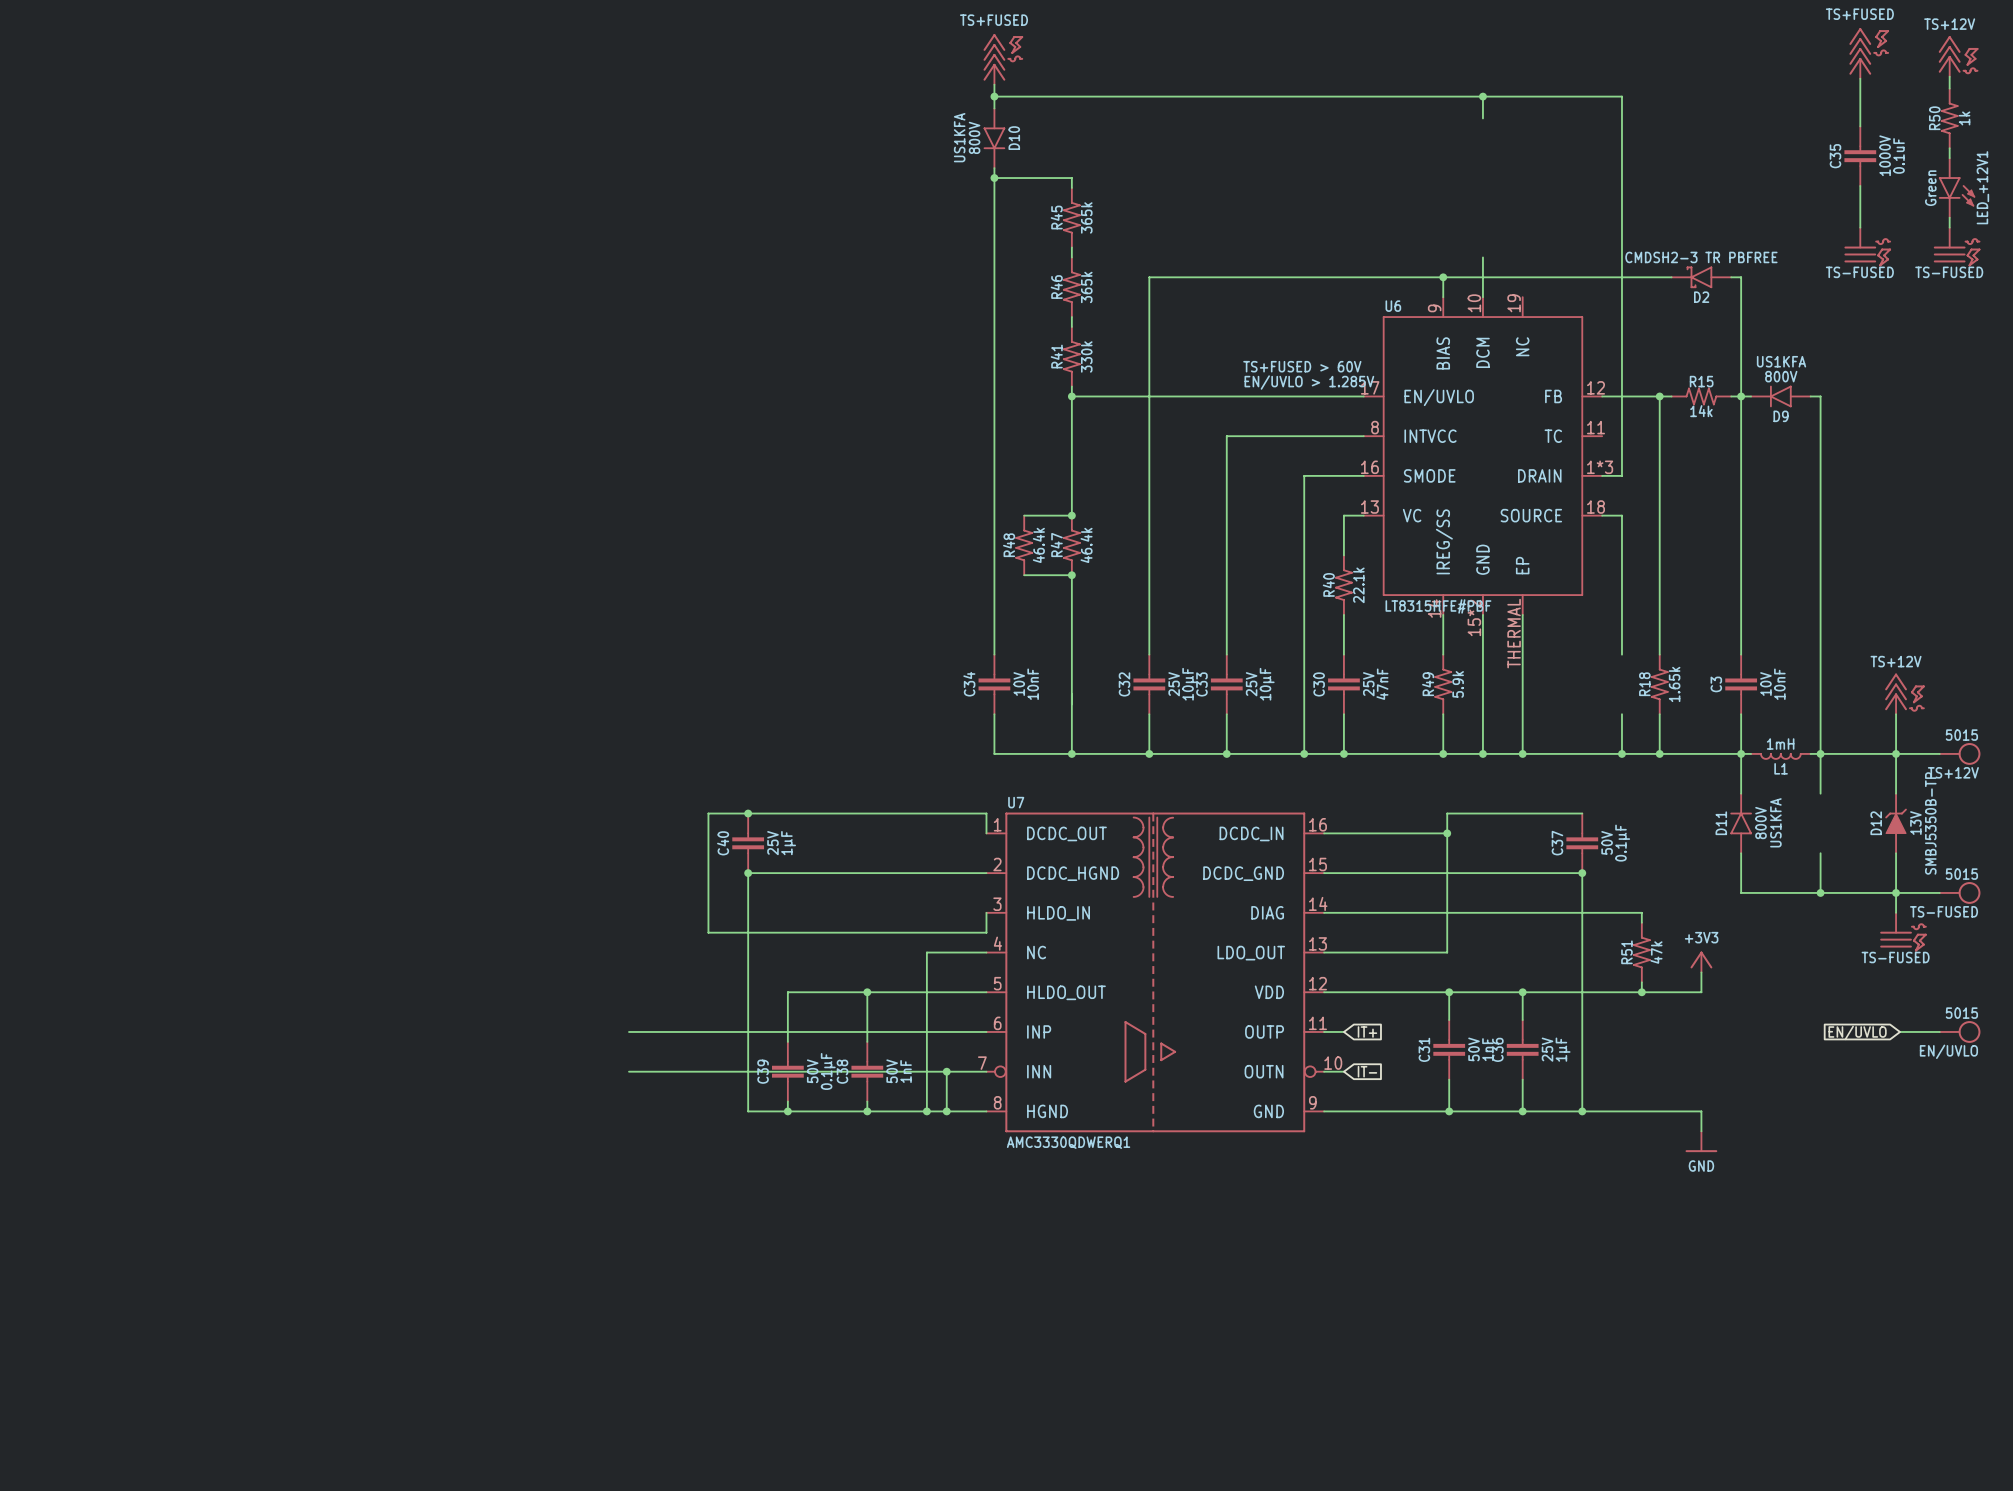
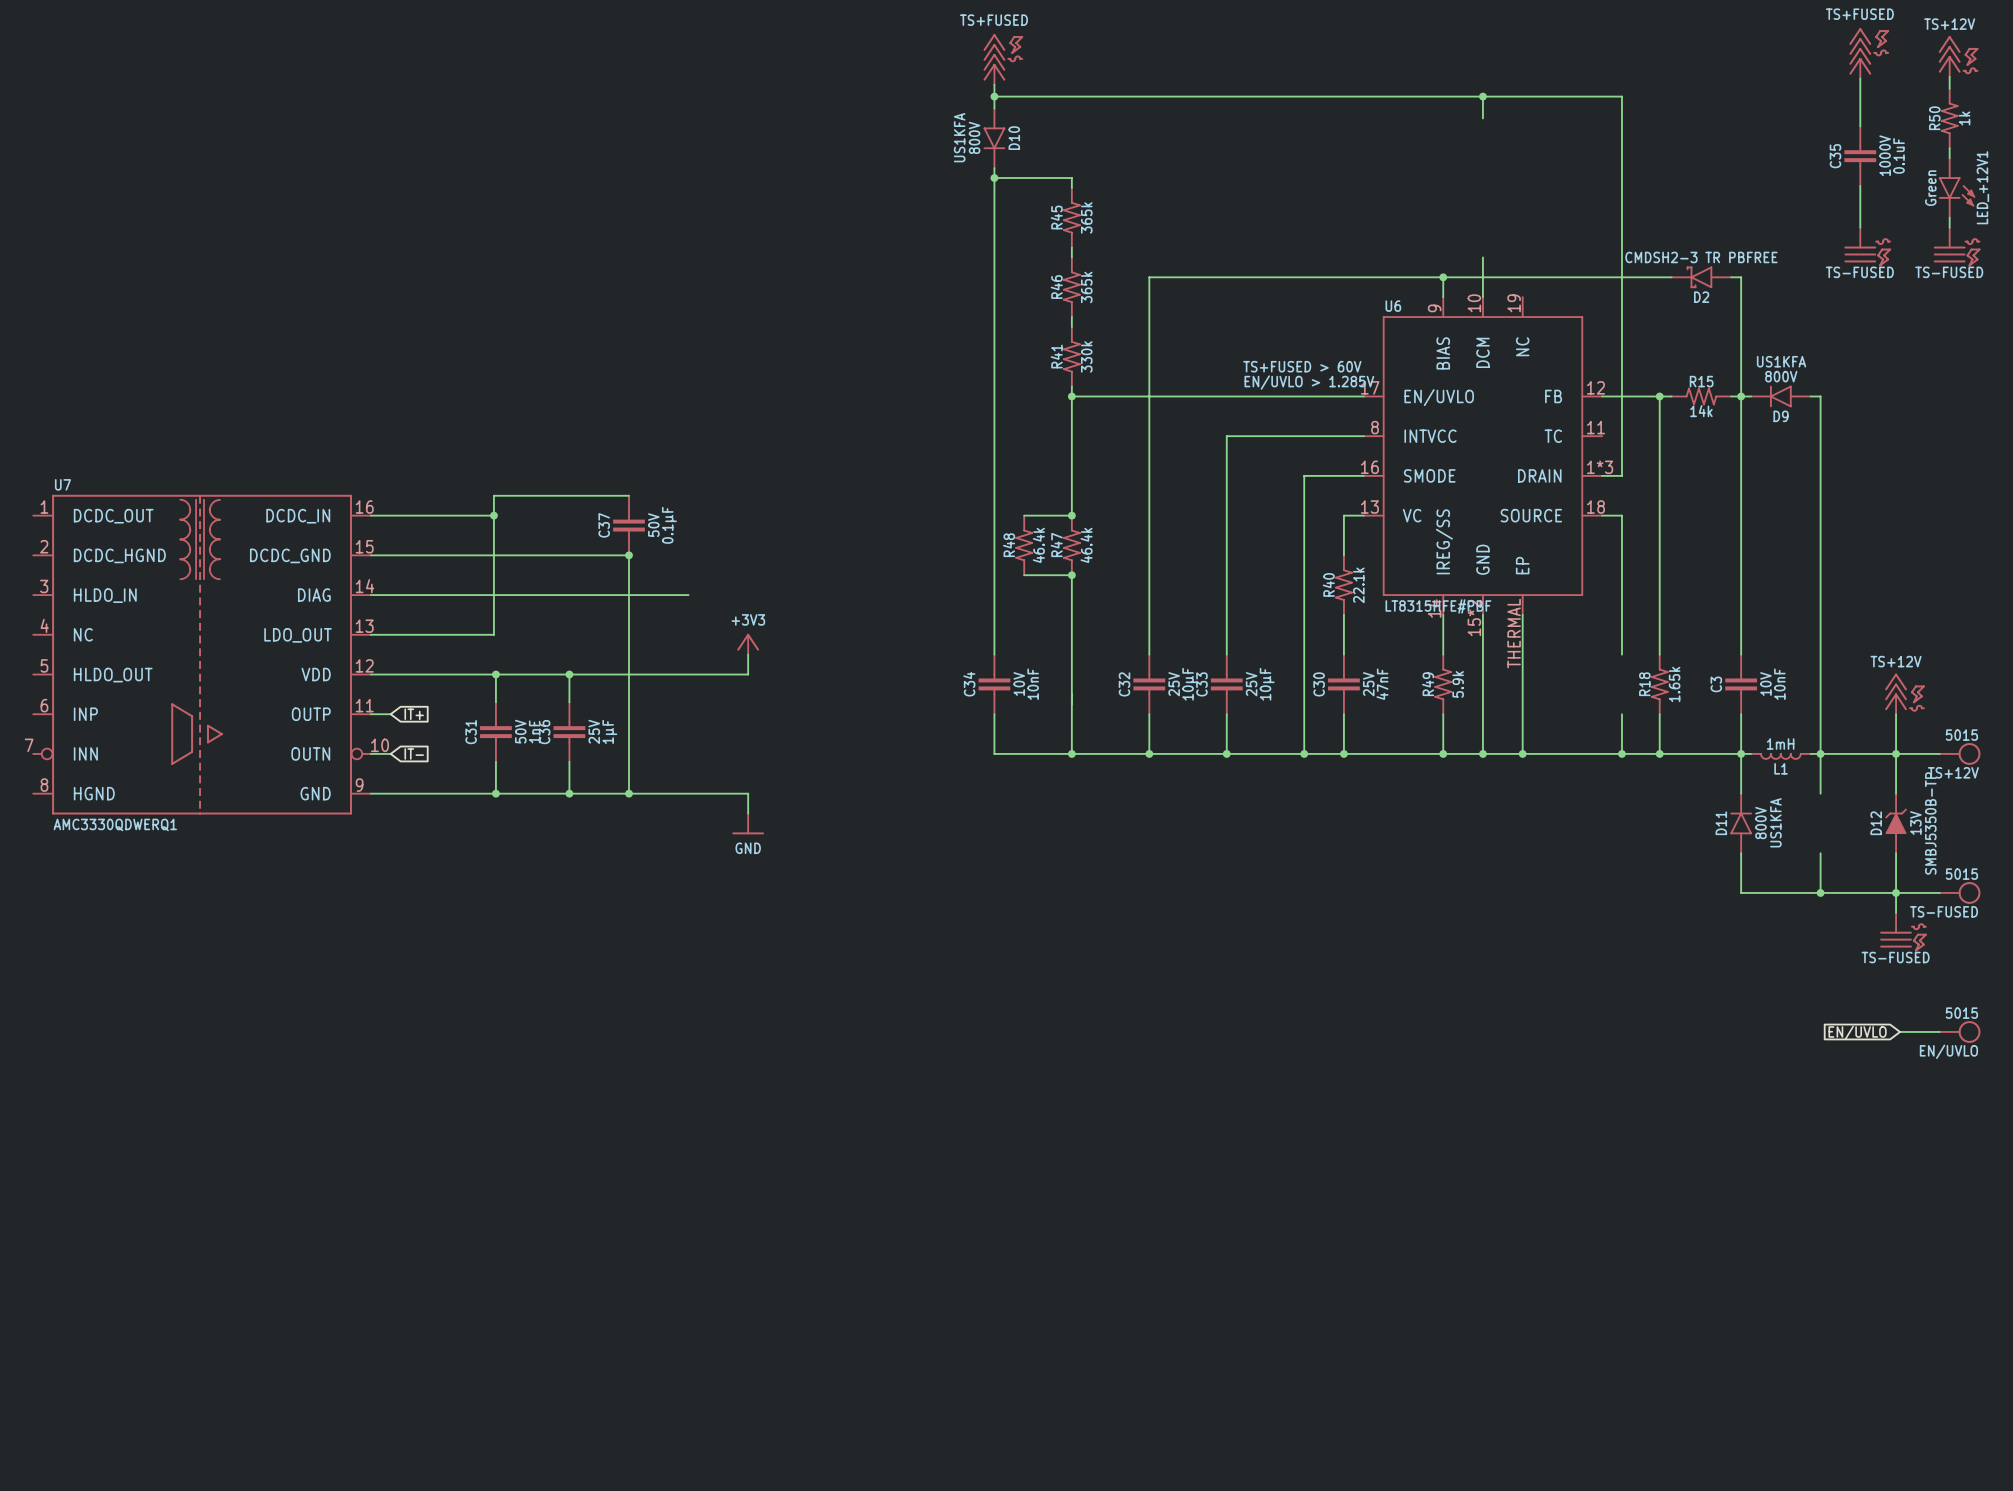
wire: none -> (629, 495) (493, 495) (493, 634) (370, 634)
wire: none -> (370, 515) (493, 515)
junction: none -> (493, 515)
wire: none -> (370, 555) (629, 555) (629, 793)
junction: none -> (629, 555)
wire: none -> (370, 595) (688, 595)
power symbol: none -> +3V3 (748, 644)
wire: none -> (748, 654) (748, 674) (370, 674)
wire: none -> (495, 674) (495, 702)
junction: none -> (495, 674)
wire: none -> (569, 674) (569, 702)
junction: none -> (569, 674)
wire: none -> (370, 714) (390, 714)
global label: none -> IT+ (414, 714)
wire: none -> (370, 753) (390, 753)
global label: none -> IT- (414, 753)
wire: none -> (495, 761) (495, 793)
wire: none -> (569, 761) (569, 793)
wire: none -> (370, 793) (748, 793) (748, 813)
junction: none -> (495, 793)
junction: none -> (569, 793)
junction: none -> (629, 793)
junction: (748, 813) -> none
wire: (1582, 813) (1447, 813) (1447, 952) (1324, 952) -> none
power symbol: none -> GND (748, 823)
wire: (986, 833) (986, 813) (708, 813) (708, 932) (986, 932) (986, 912) -> none
wire: (1324, 833) (1447, 833) -> none
junction: (1447, 833) -> none
C40: (748, 843) -> none
C37 position: (1582, 843) -> (629, 525)
junction: (748, 873) -> none
wire: (986, 873) (748, 873) (748, 1111) (986, 1111) -> none
wire: (1324, 873) (1582, 873) (1582, 1111) -> none
junction: (1582, 873) -> none
wire: (1324, 912) (1641, 912) (1641, 922) -> none
wire: (986, 952) (926, 952) (926, 1111) -> none
R51: (1641, 952) -> none
power symbol: +3V3 (1701, 961) -> none
U7 position: (1155, 972) -> (202, 654)
wire: (1701, 972) (1701, 992) (1324, 992) -> none
wire: (1641, 982) (1641, 992) -> none
wire: (867, 992) (867, 1041) -> none
junction: (867, 992) -> none
wire: (986, 992) (787, 992) (787, 1041) -> none
wire: (1449, 992) (1449, 1020) -> none
junction: (1449, 992) -> none
wire: (1522, 992) (1522, 1020) -> none
junction: (1522, 992) -> none
junction: (1641, 992) -> none
wire: (629, 1031) (986, 1031) -> none
wire: (1324, 1031) (1343, 1031) -> none
global label: IT+ (1367, 1031) -> none
C31 position: (1449, 1049) -> (495, 732)
C36 position: (1522, 1049) -> (569, 732)
wire: (629, 1071) (986, 1071) -> none
C39: (787, 1071) -> none
C38: (867, 1071) -> none
wire: (946, 1071) (946, 1111) -> none
junction: (946, 1071) -> none
wire: (1324, 1071) (1343, 1071) -> none
global label: IT- (1367, 1071) -> none
wire: (1449, 1079) (1449, 1111) -> none
wire: (1522, 1079) (1522, 1111) -> none
wire: (787, 1101) (787, 1111) -> none
wire: (867, 1101) (867, 1111) -> none
junction: (787, 1111) -> none
junction: (867, 1111) -> none
junction: (926, 1111) -> none
junction: (946, 1111) -> none
wire: (1324, 1111) (1701, 1111) (1701, 1131) -> none
junction: (1449, 1111) -> none
junction: (1522, 1111) -> none
junction: (1582, 1111) -> none
power symbol: GND (1701, 1141) -> none

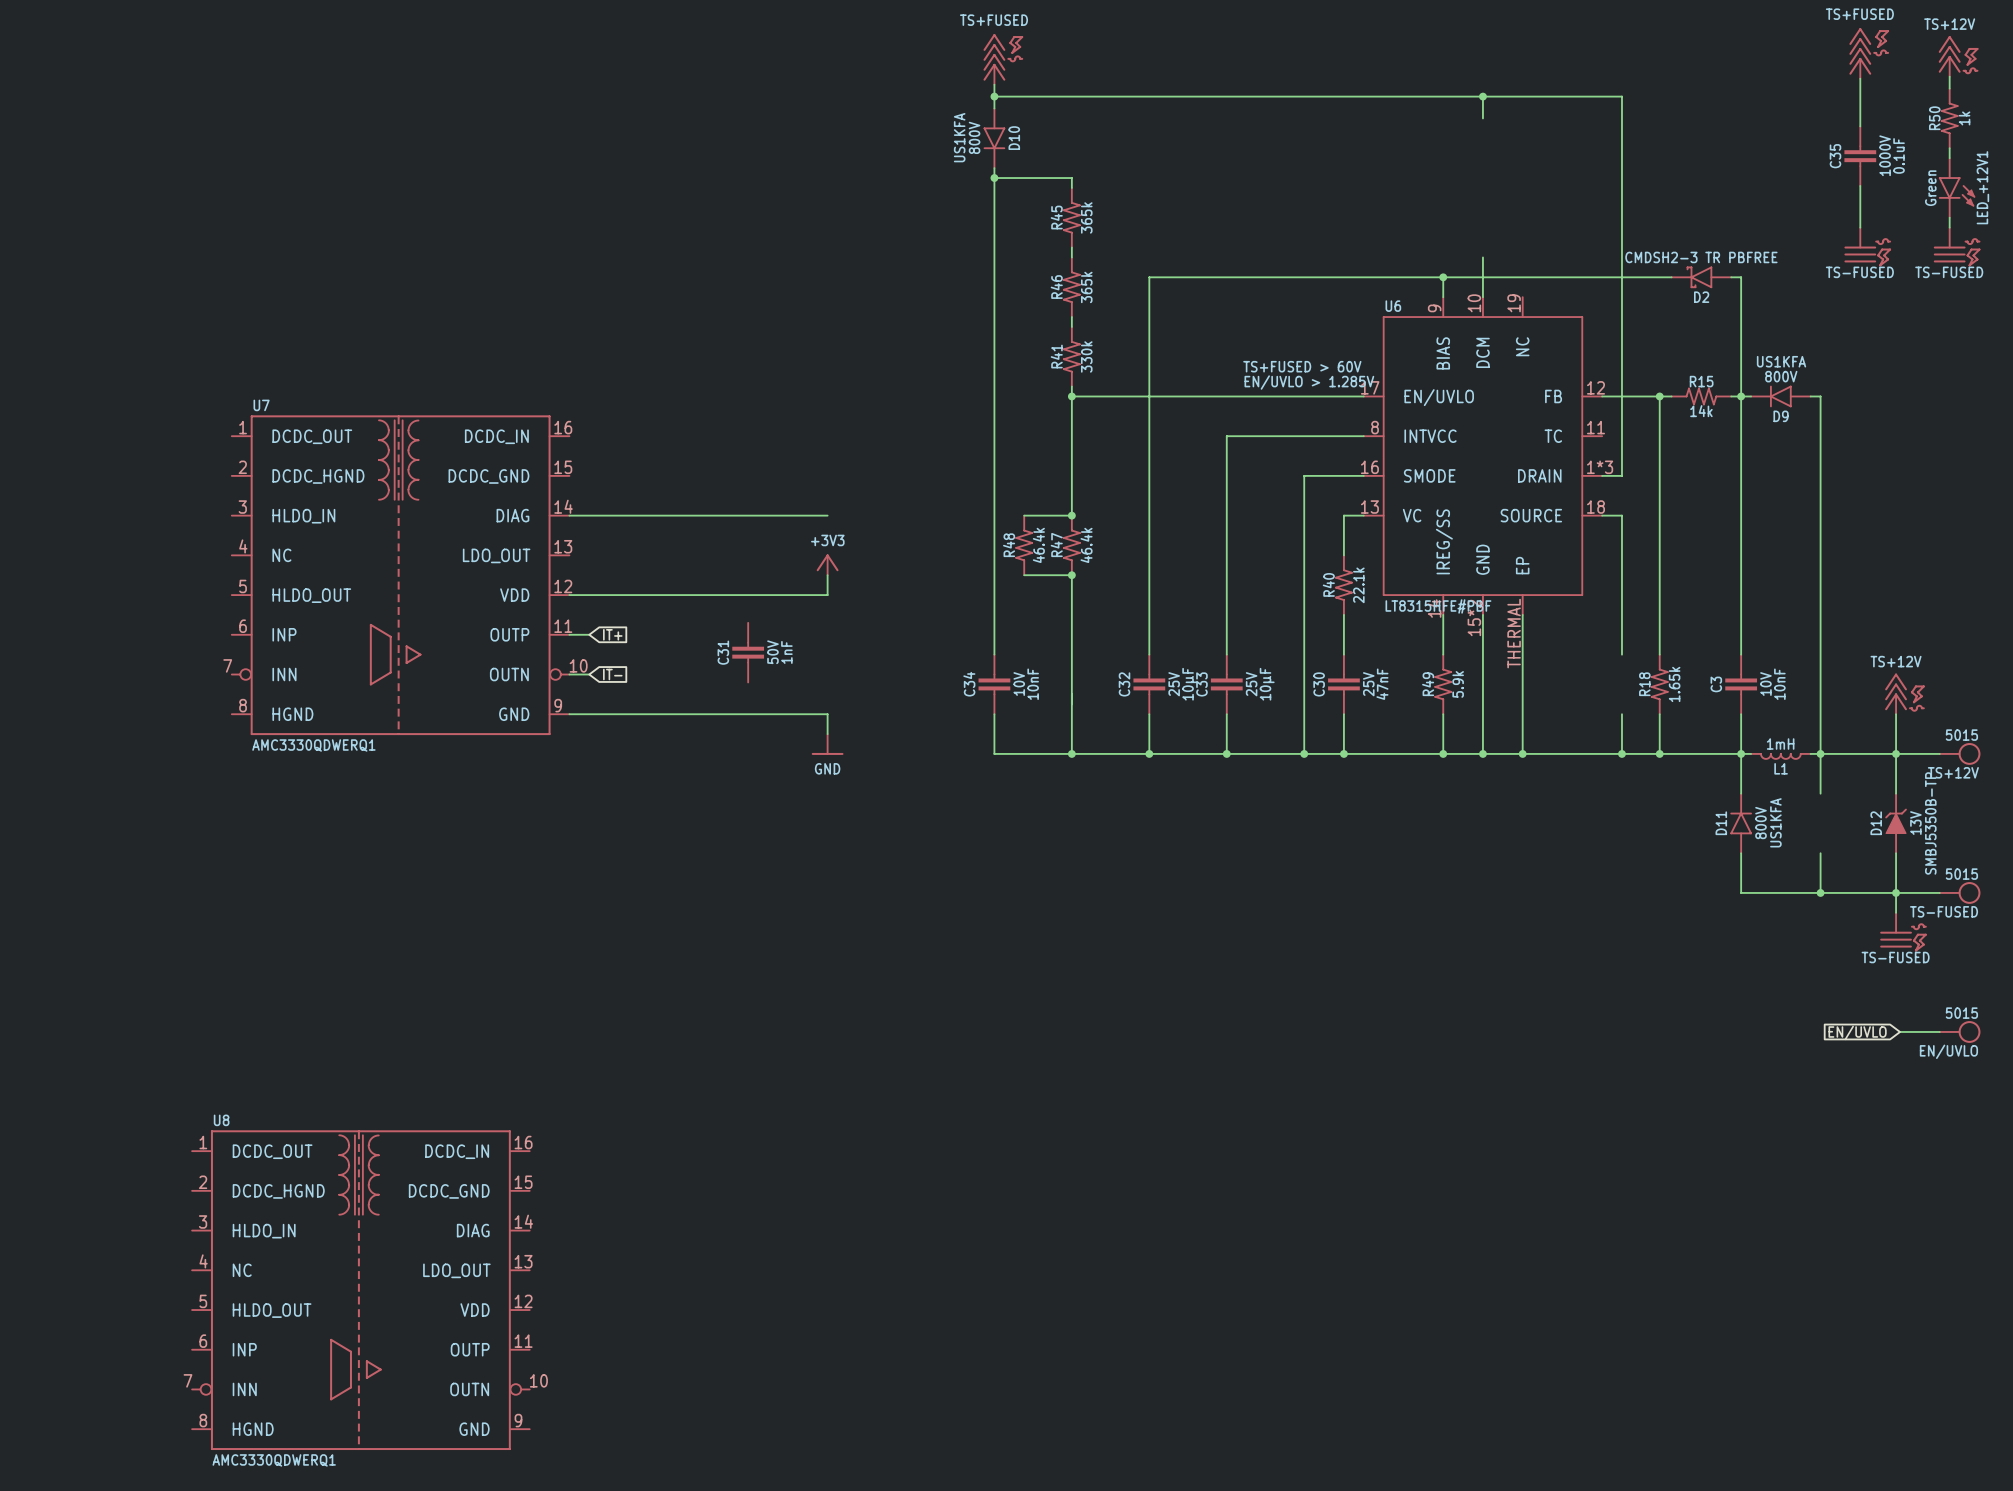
wire: (629, 495) (493, 495) (493, 634) (370, 634) -> none
wire: (370, 515) (493, 515) -> none
junction: (493, 515) -> none
wire: none -> (569, 515) (827, 515)
C37: (629, 525) -> none
wire: (370, 555) (629, 555) (629, 793) -> none
junction: (629, 555) -> none
wire: none -> (827, 575) (827, 595) (688, 595)
wire: (370, 595) (569, 595) -> none
wire: none -> (569, 634) (589, 634)
global label: none -> IT+ (612, 634)
power symbol position: +3V3 (748, 644) -> +3V3 (827, 564)
U7 position: (202, 654) -> (400, 575)
wire: (748, 654) (748, 674) (589, 674) -> none
wire: (370, 674) (569, 674) (569, 702) -> none
wire: (495, 674) (495, 702) -> none
junction: (495, 674) -> none
junction: (569, 674) -> none
global label: none -> IT- (612, 674)
wire: (370, 714) (390, 714) -> none
global label: IT+ (414, 714) -> none
wire: none -> (569, 714) (827, 714) (827, 734)
C31 position: (495, 732) -> (748, 652)
C36: (569, 732) -> none
wire: (370, 753) (390, 753) -> none
global label: IT- (414, 753) -> none
wire: (495, 761) (495, 793) -> none
wire: (569, 761) (569, 793) -> none
wire: (370, 793) (748, 793) (748, 813) -> none
junction: (495, 793) -> none
junction: (569, 793) -> none
junction: (629, 793) -> none
power symbol position: GND (748, 823) -> GND (827, 744)
U8: none -> (360, 1290)

